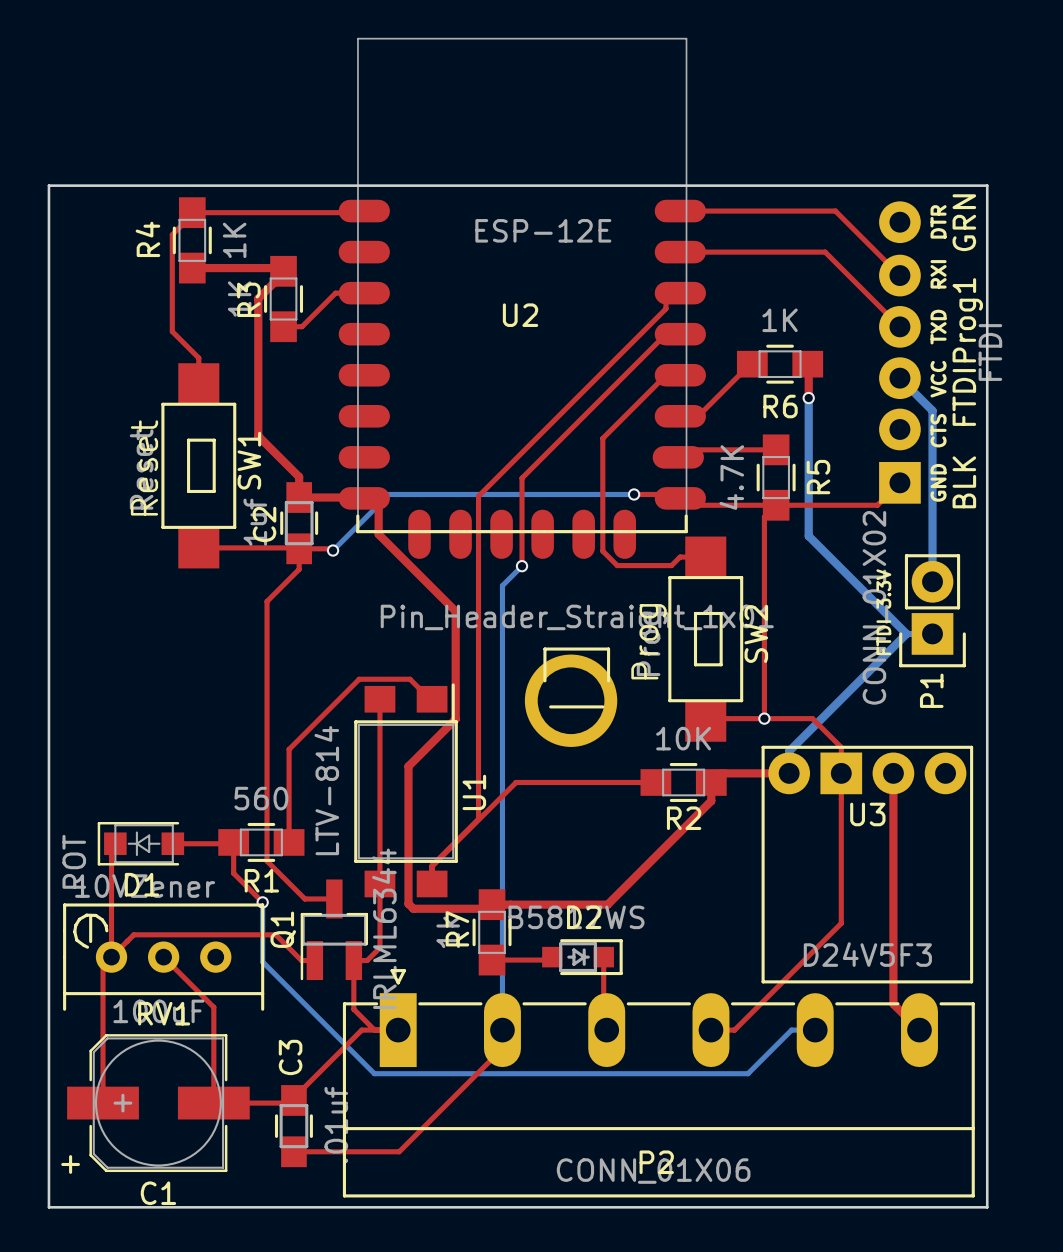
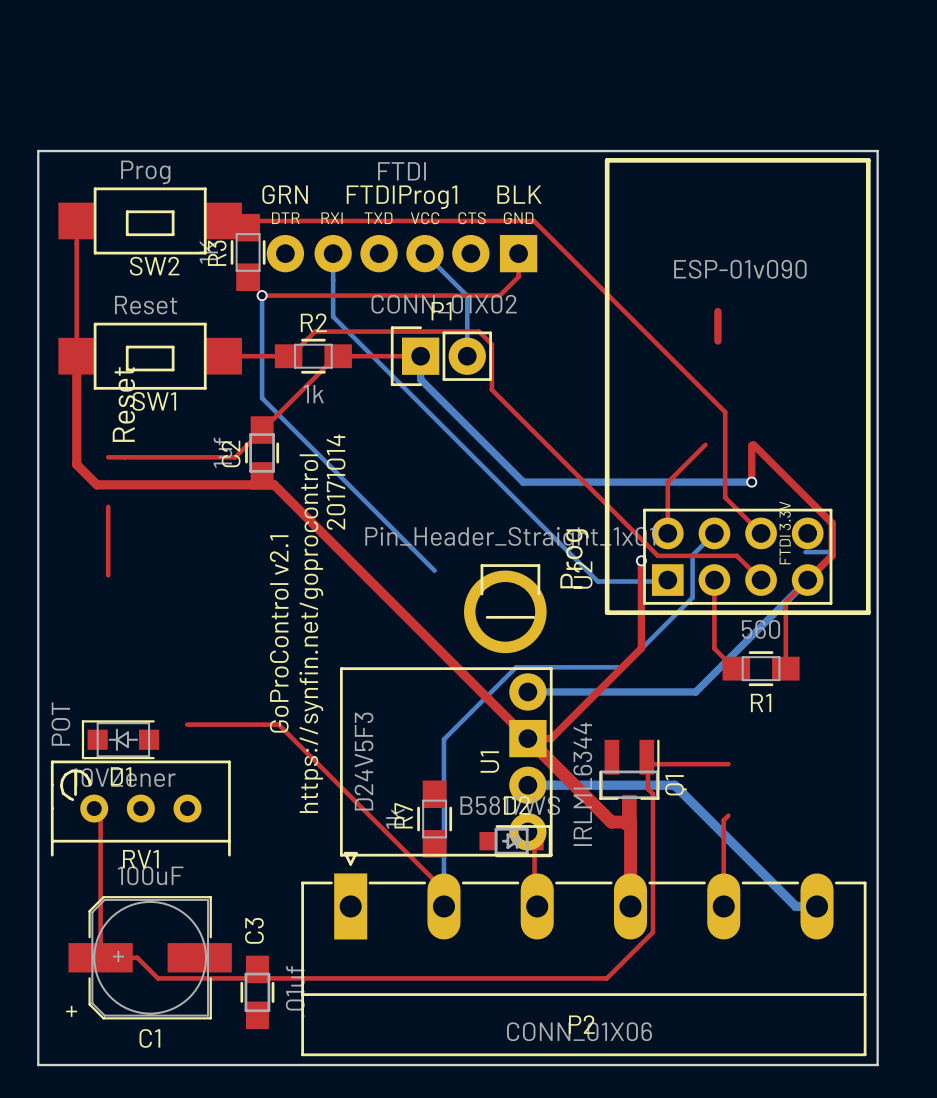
U2 footprint: [338, 38, 707, 559] -> [604, 158, 871, 616]
top track: (378, 211) (377, 212) (192, 212) (172, 234) (172, 331) (198, 358) (198, 383) -> none
top track: (665, 211) (835, 211) (899, 275) -> none
U2 value: ESP-12E (543, 230) -> ESP-01v090 (740, 269)
R4: 1K (192, 240) -> none
top track: (665, 252) (825, 252) (899, 326) -> none
top track: none -> (76, 220) (76, 464) (96, 484) (274, 484) (527, 738)
top track: none -> (223, 220) (533, 220) (725, 412) (725, 497) (761, 533)
top track: (192, 268) (280, 268) (283, 271) (258, 298) (258, 436) (299, 476) (299, 497) (377, 497) (378, 534) (455, 611) (455, 719) (408, 766) (408, 903) (413, 908) (487, 908) (492, 904) (607, 904) (711, 800) (711, 782) (720, 773) (789, 773) -> none
top track: (378, 293) (335, 293) (302, 326) (283, 326) -> none
top track: (665, 293) (665, 308) (478, 496) (478, 819) (432, 865) (432, 883) -> none
bottom track: none -> (333, 253) (333, 316) (597, 581) (667, 580)
bottom track: none -> (424, 253) (467, 295) (467, 356)
top track: none -> (518, 253) (518, 276) (499, 295) (262, 295)
U2 name position: U2 (520, 315) -> U2 (583, 575)
top track: (664, 332) (665, 334) (522, 478) (522, 566) -> none
bottom track: none -> (262, 295) (262, 398) (434, 570)
via: none -> (262, 295)
FTDIProg1 rotation: 0° (899, 352) -> 90° counterclockwise (401, 253)
FTDIProg1 position: (899, 352) -> (401, 253)
top track: (752, 364) (698, 416) (665, 416) -> none
R6: 1K (780, 364) -> none
top track: (665, 375) (602, 438) (602, 551) (617, 565) (671, 565) (680, 557) (705, 557) -> none
bottom track: (899, 378) (932, 410) (932, 581) -> none
bottom track: (808, 398) (808, 536) (906, 633) (789, 751) (789, 773) -> none
via: (808, 398) -> none
top track: none -> (223, 356) (290, 356) (315, 331) (479, 331) (491, 344) (491, 389) (657, 555) (736, 555) (761, 580)
top track: none -> (420, 356) (336, 356) (235, 457) (108, 457)
bottom track: none -> (420, 356) (420, 379) (523, 482) (751, 482)
top track: (776, 449) (673, 449) (665, 457) -> none
SW1 rotation: 0° (198, 465) -> 90° clockwise (150, 356)
R5: 4.7K (776, 477) -> none
top track: (899, 482) (877, 505) (672, 505) (662, 494) (634, 494) -> none
bottom track: (634, 494) (389, 494) (333, 550) -> none
via: (634, 494) -> none
top track: (776, 503) (764, 516) (764, 718) -> none
top track: none -> (705, 444) (667, 482) (667, 533)
top track: (198, 547) (299, 548) -> none
top track: (299, 548) (331, 548) (333, 550) -> none
top track: (299, 548) (299, 569) (267, 601) (267, 861) (304, 898) (334, 898) -> none
via: (333, 550) -> none
text: none -> 20171014 (336, 482)
top track: none -> (751, 482) (751, 444) (753, 444) (832, 523) (832, 555) (785, 601) (785, 668)
via: none -> (751, 482)
bottom track: (522, 566) (502, 585) (502, 843) -> (714, 533) (692, 555) (692, 597) (622, 667) (516, 667) (443, 739)
via: (522, 566) -> none
top track: none -> (108, 506) (108, 575)
P1 rotation: 0° (932, 610) -> 90° clockwise (441, 356)
P1 position: (932, 610) -> (441, 356)
SW2 rotation: 0° (705, 639) -> 90° clockwise (150, 220)
SW2 position: (705, 639) -> (150, 220)
top track: none -> (641, 560) (641, 648) (551, 738) (527, 738)
top track: none -> (714, 580) (714, 648) (736, 668)
bottom track: none -> (807, 580) (695, 691) (527, 691)
U1 footprint: [354, 683, 458, 898] -> [339, 667, 553, 857]
P1 name position: P1 (931, 690) -> P1 (441, 311)
top track: (379, 699) (379, 947) (367, 960) (353, 960) (353, 1009) (374, 1030) -> none
top track: (432, 699) (410, 679) (359, 679) (289, 749) (289, 842) -> none
via position: (764, 718) -> (641, 560)
top track: (705, 721) (708, 718) (812, 718) (841, 747) (841, 923) (734, 1030) (710, 1030) -> (527, 738) (611, 822) (630, 822) (630, 906)
text: none -> https://synfin.net/goprocontrol (311, 633)
text: none -> GoProControl v2.1 (279, 633)
R2 value: 10K (683, 738) -> 1k (313, 394)
top track: (893, 773) (893, 1004) (919, 1030) -> none
top track: (654, 781) (655, 782) (516, 782) (432, 866) -> none
R2 position: (683, 782) -> (313, 356)
U1 value: LTV-814 (326, 790) -> D24V5F3 (364, 761)
R2 name position: R2 (684, 818) -> R2 (313, 322)
R1 position: (261, 842) -> (761, 668)
top track: (115, 843) (111, 847) (111, 957) -> none
top track: (172, 843) (233, 842) (233, 873) (262, 902) -> none
U3: D24V5F3 (867, 864) -> none
top track: none -> (728, 764) (650, 764) (647, 767) (647, 789) (652, 794) (652, 932) (606, 978) (157, 978) (137, 957) (100, 957) (100, 814) (94, 808)
bottom track: none -> (527, 785) (674, 785) (795, 906) (817, 906)
bottom track: (262, 902) (262, 961) (374, 1073) (748, 1073) (791, 1030) (815, 1030) -> none
via: (262, 902) -> none
top track: none -> (728, 815) (723, 820) (723, 906)
Q1 rotation: 0° (334, 929) -> 180° (629, 784)
Q1 position: (334, 929) -> (629, 784)
top track: (163, 957) (213, 1007) (213, 1103) (291, 1103) (293, 1097) (361, 1030) (398, 1030) -> none
RV1 position: (163, 957) -> (140, 808)
top track: (552, 957) (549, 960) (492, 960) -> none
top track: (314, 960) (301, 960) (275, 934) (133, 934) (103, 965) (103, 1103) -> none
top track: (502, 1030) (502, 1048) (399, 1151) (293, 1151) -> (443, 906) (443, 889) (278, 724) (187, 724)
C1 position: (158, 1103) -> (150, 957)

